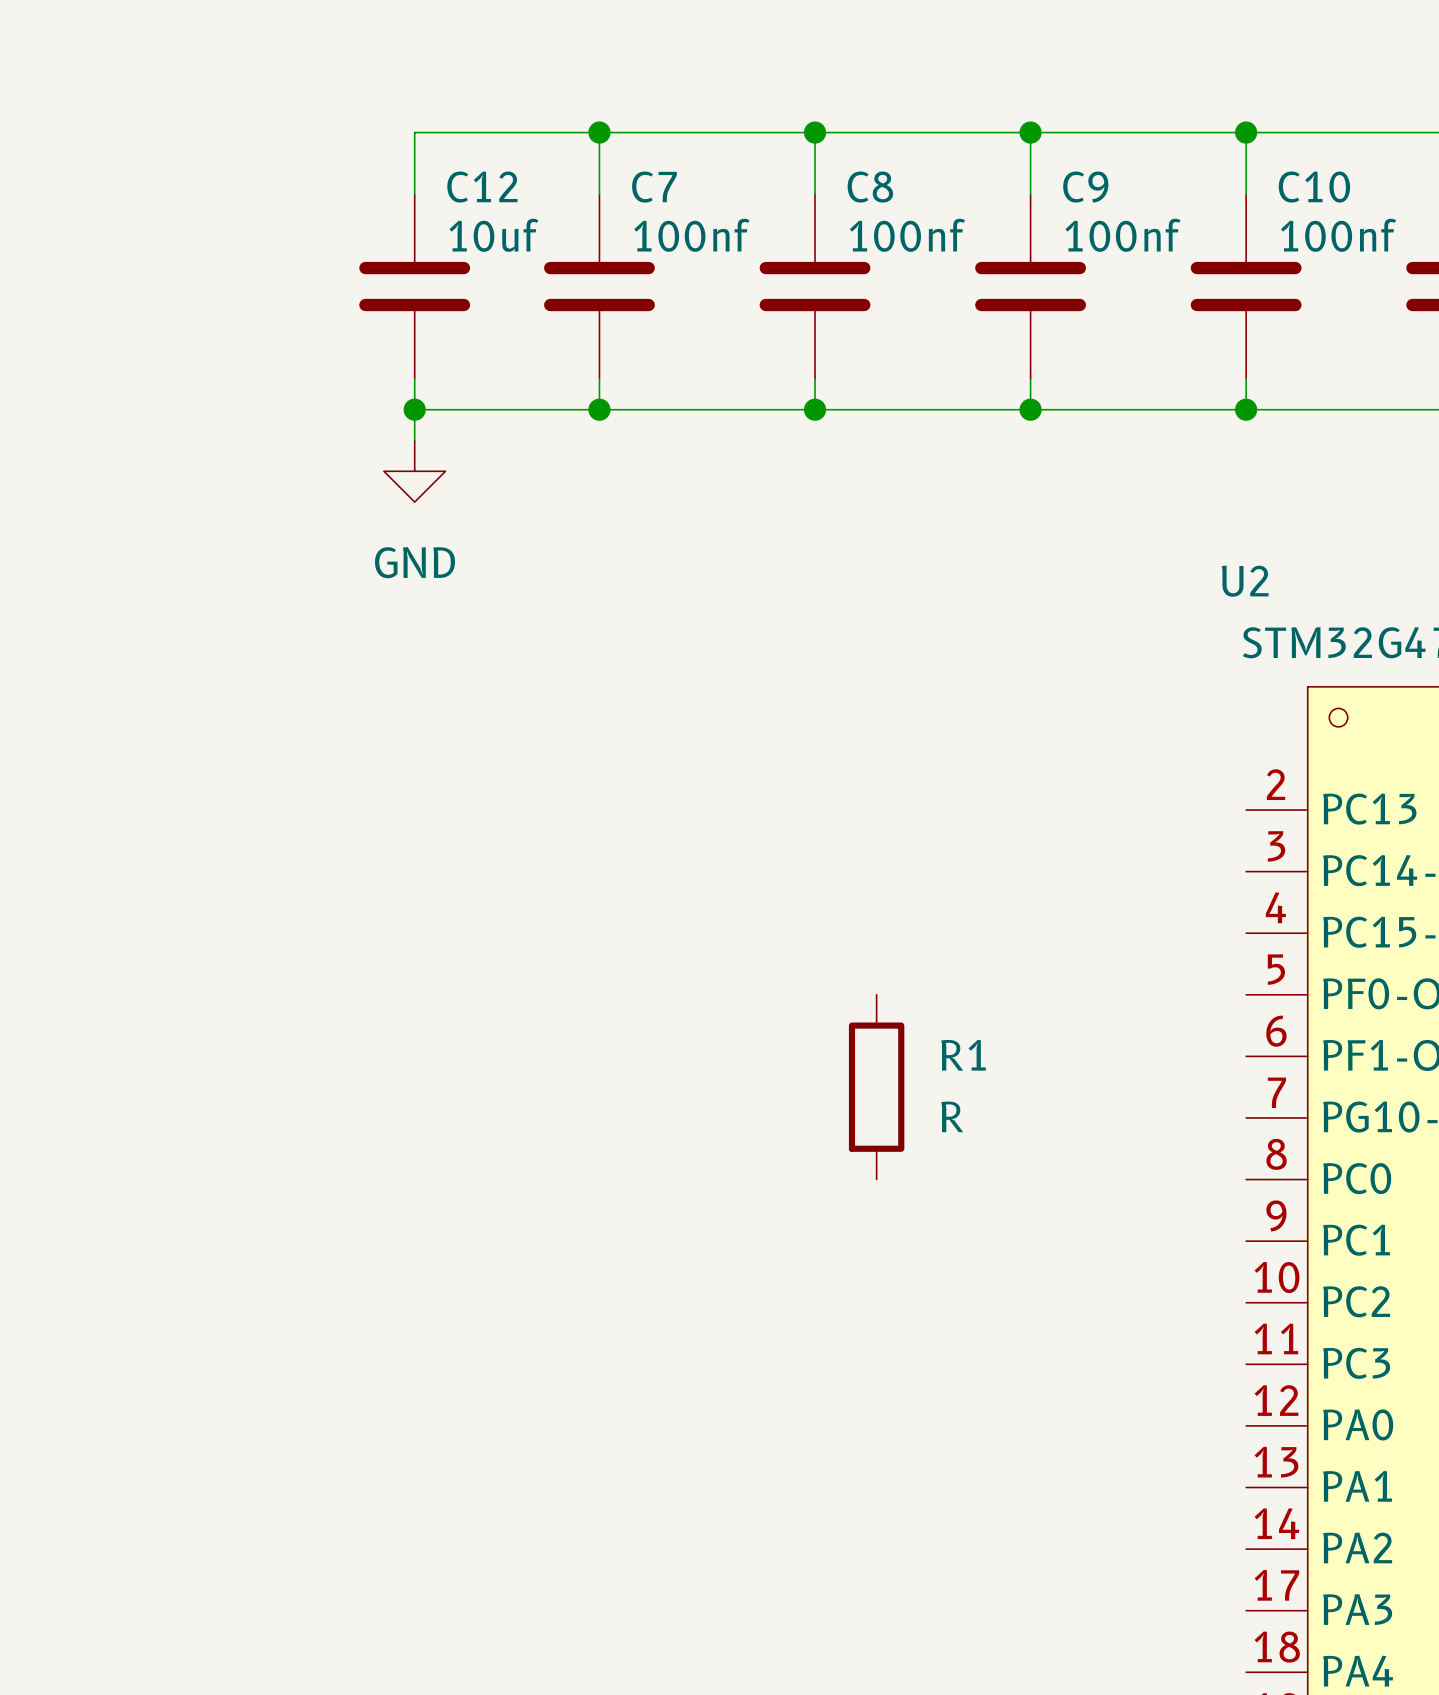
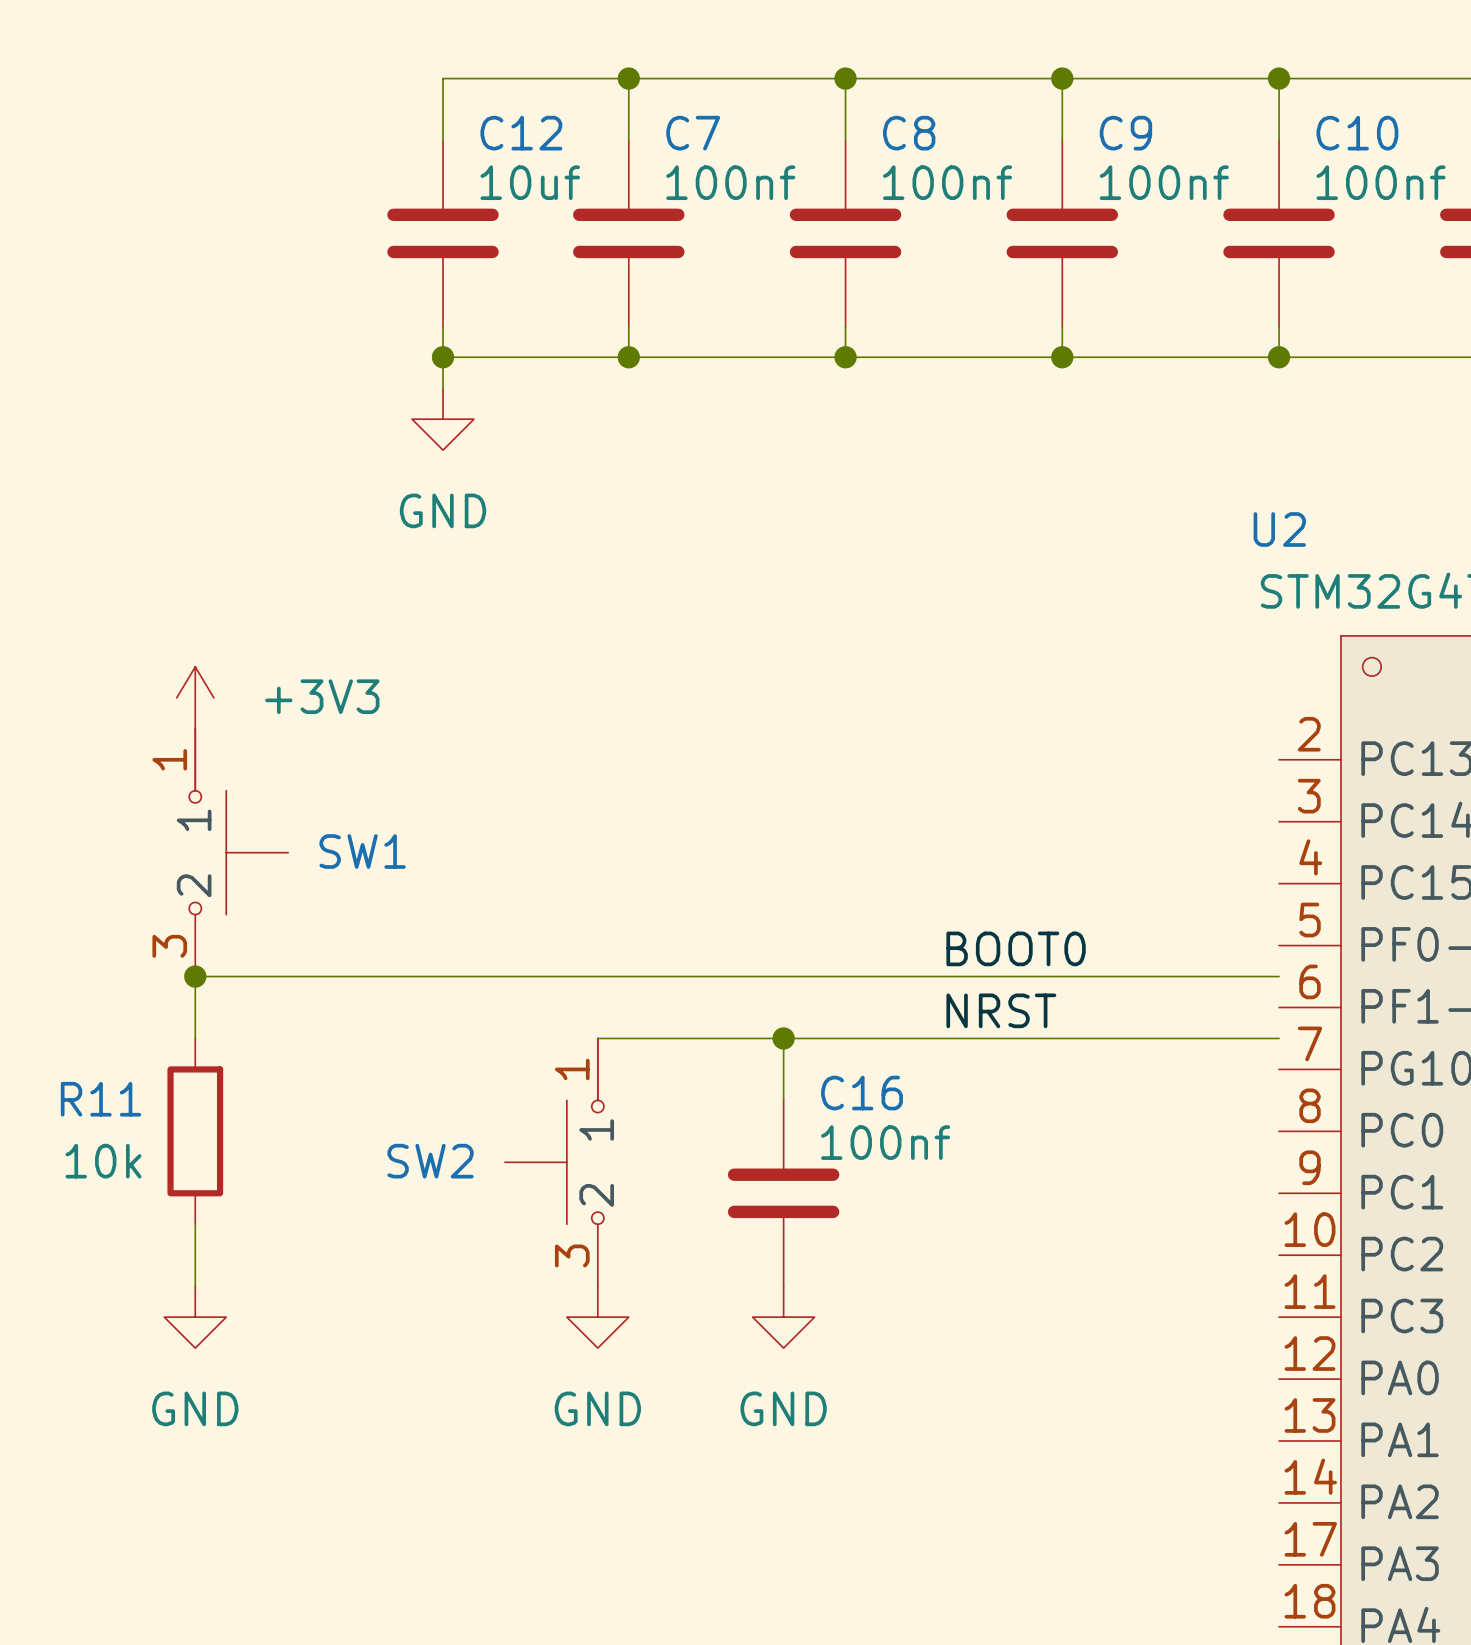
power symbol: none -> +3V3 (195, 697)
SW1: none -> (238, 852)
label: none -> BOOT0 (1016, 948)
junction: none -> (195, 976)
wire: none -> (1279, 976) (195, 976) (195, 1038)
label: none -> NRST (1001, 1010)
wire: none -> (597, 1038) (1279, 1038)
wire: none -> (783, 1038) (783, 1100)
junction: none -> (783, 1038)
R1: R (876, 1087) -> none
R11: none -> 10k (195, 1131)
SW2: none -> (554, 1162)
C16: none -> 100nf (783, 1193)
wire: none -> (195, 1224) (195, 1286)
power symbol: none -> GND (195, 1317)
power symbol: none -> GND (597, 1317)
power symbol: none -> GND (783, 1317)

